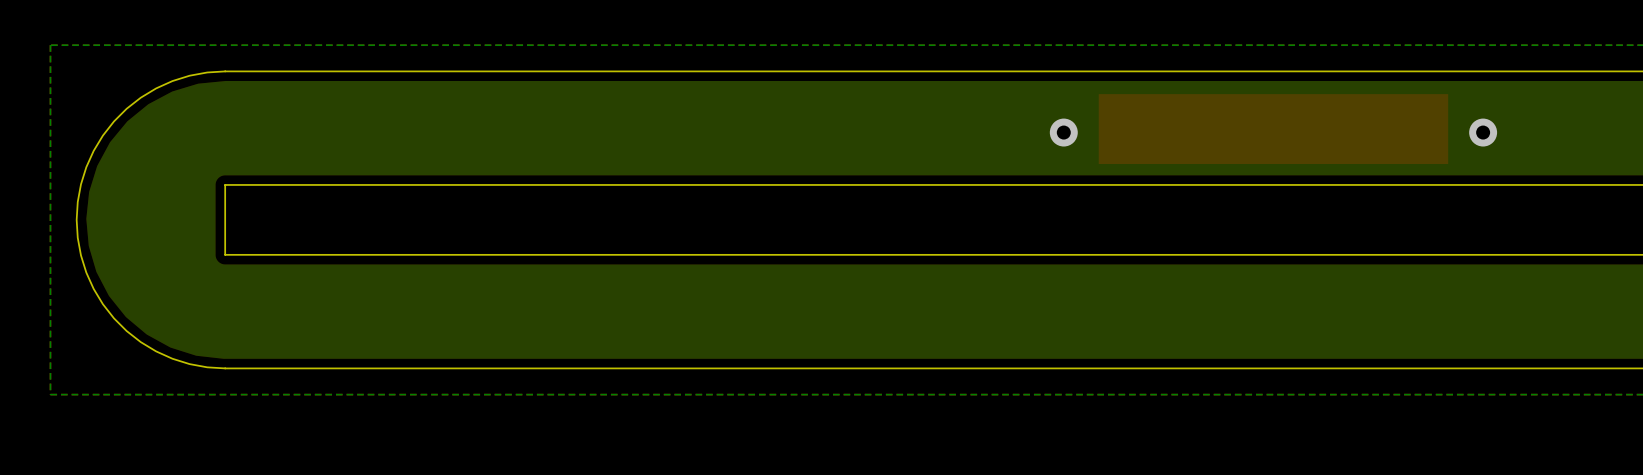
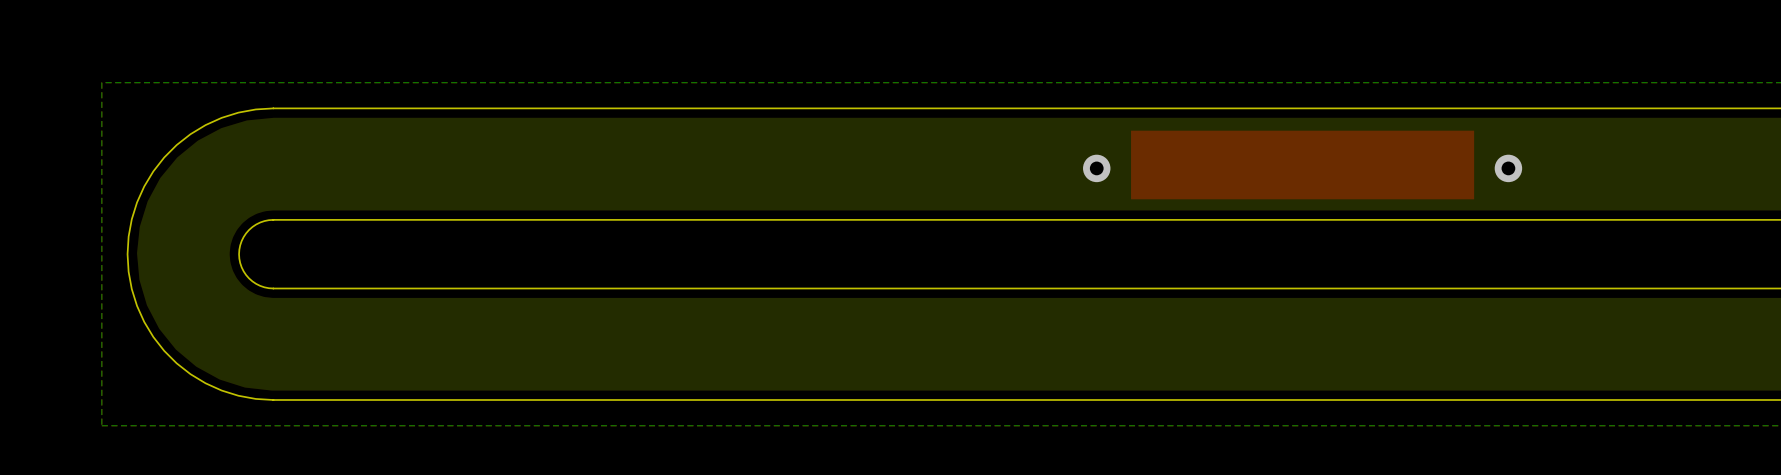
board edge: (225, 184) (225, 254) -> (273, 219) (260, 222) (249, 229) (241, 241) (239, 254) (241, 267) (249, 278) (260, 285) (273, 288)

